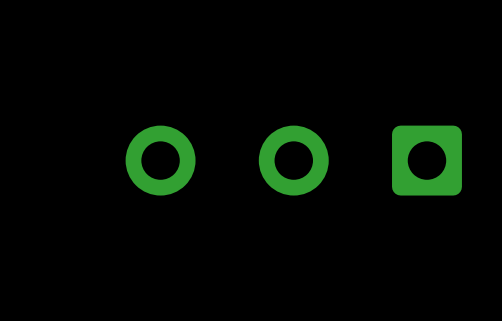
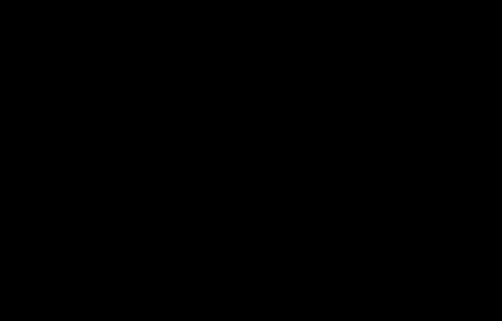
part: (293, 160) -> none

